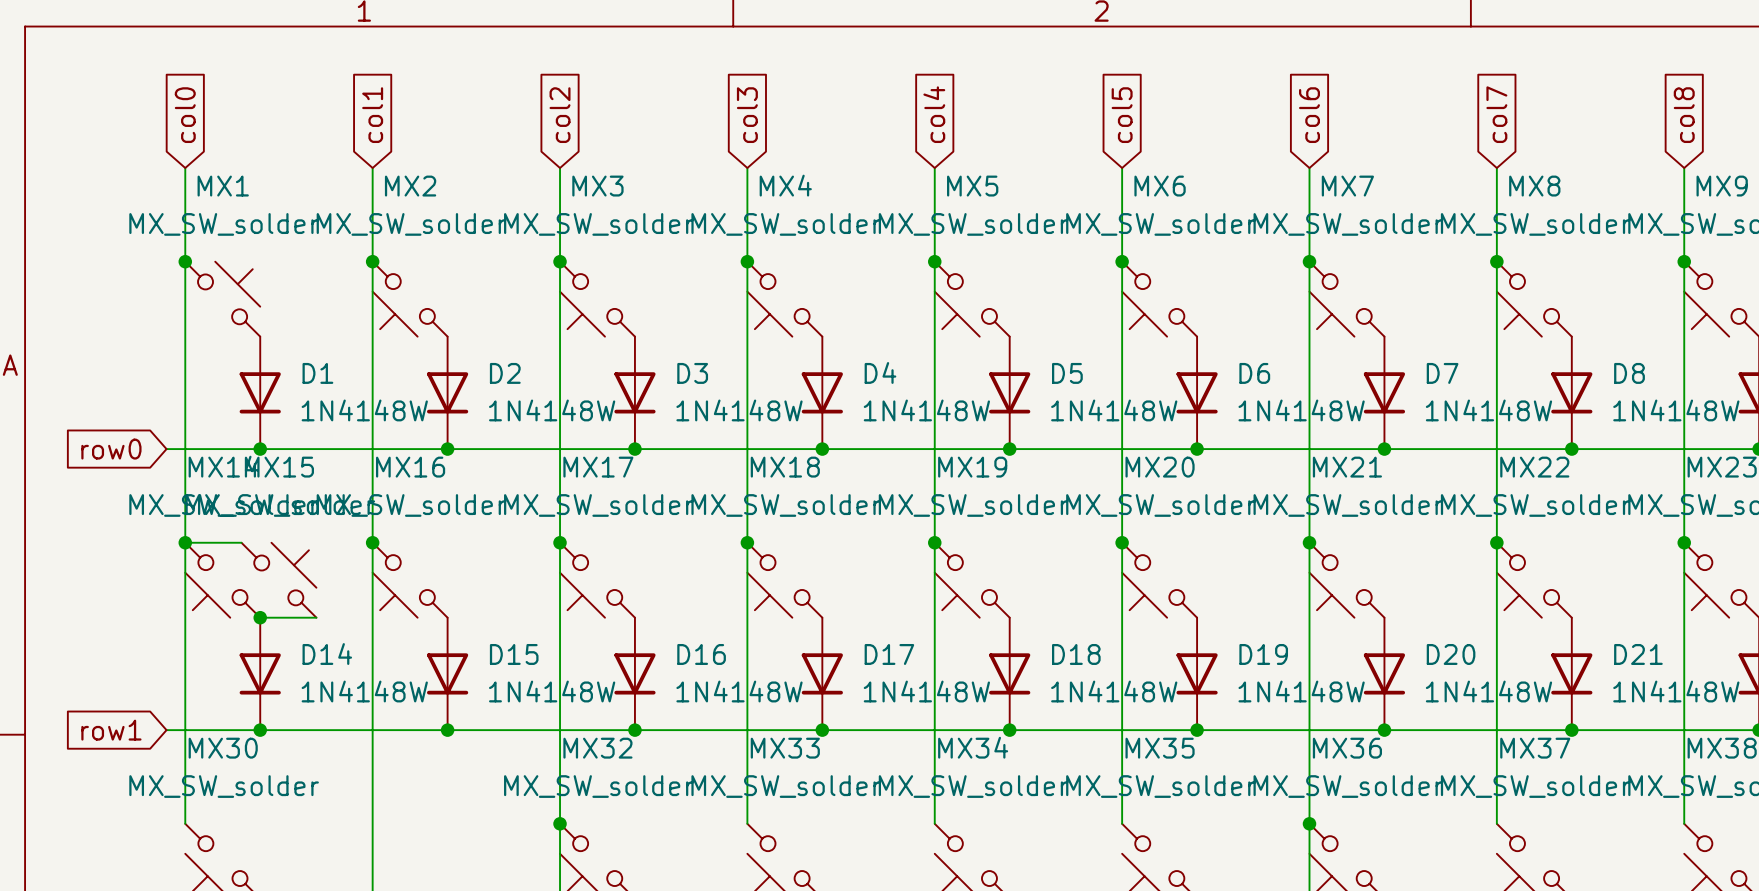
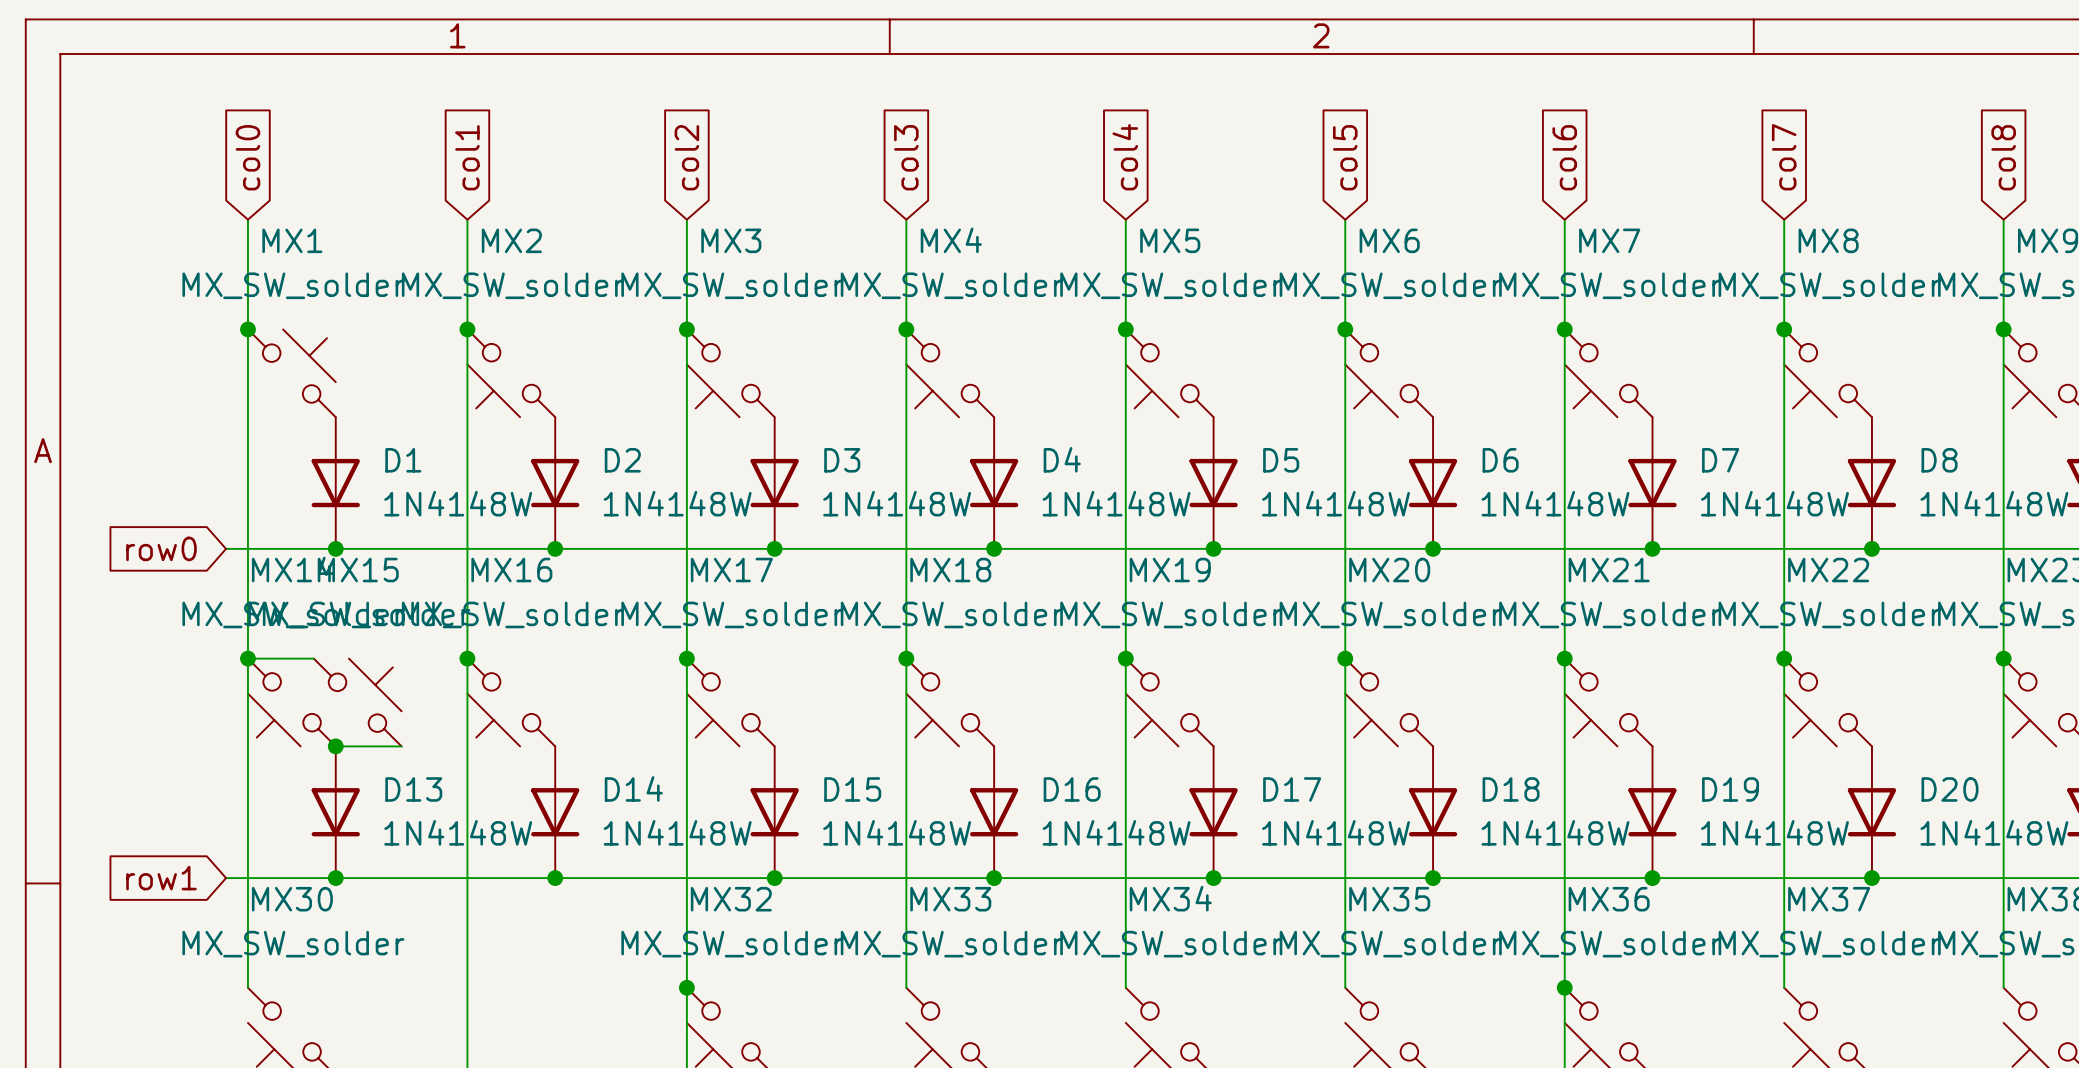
D14 name: D14 (327, 654) -> D13 (413, 789)
D15 name: D15 (514, 654) -> D14 (633, 788)
D16 name: D16 (701, 654) -> D15 (852, 789)
D17 name: D17 (889, 654) -> D16 (1072, 789)
D18 name: D18 (1076, 654) -> D17 (1292, 789)
D19 name: D19 (1263, 654) -> D18 (1511, 789)
D20 name: D20 (1451, 654) -> D19 (1730, 789)
D21 name: D21 (1638, 654) -> D20 (1949, 789)

